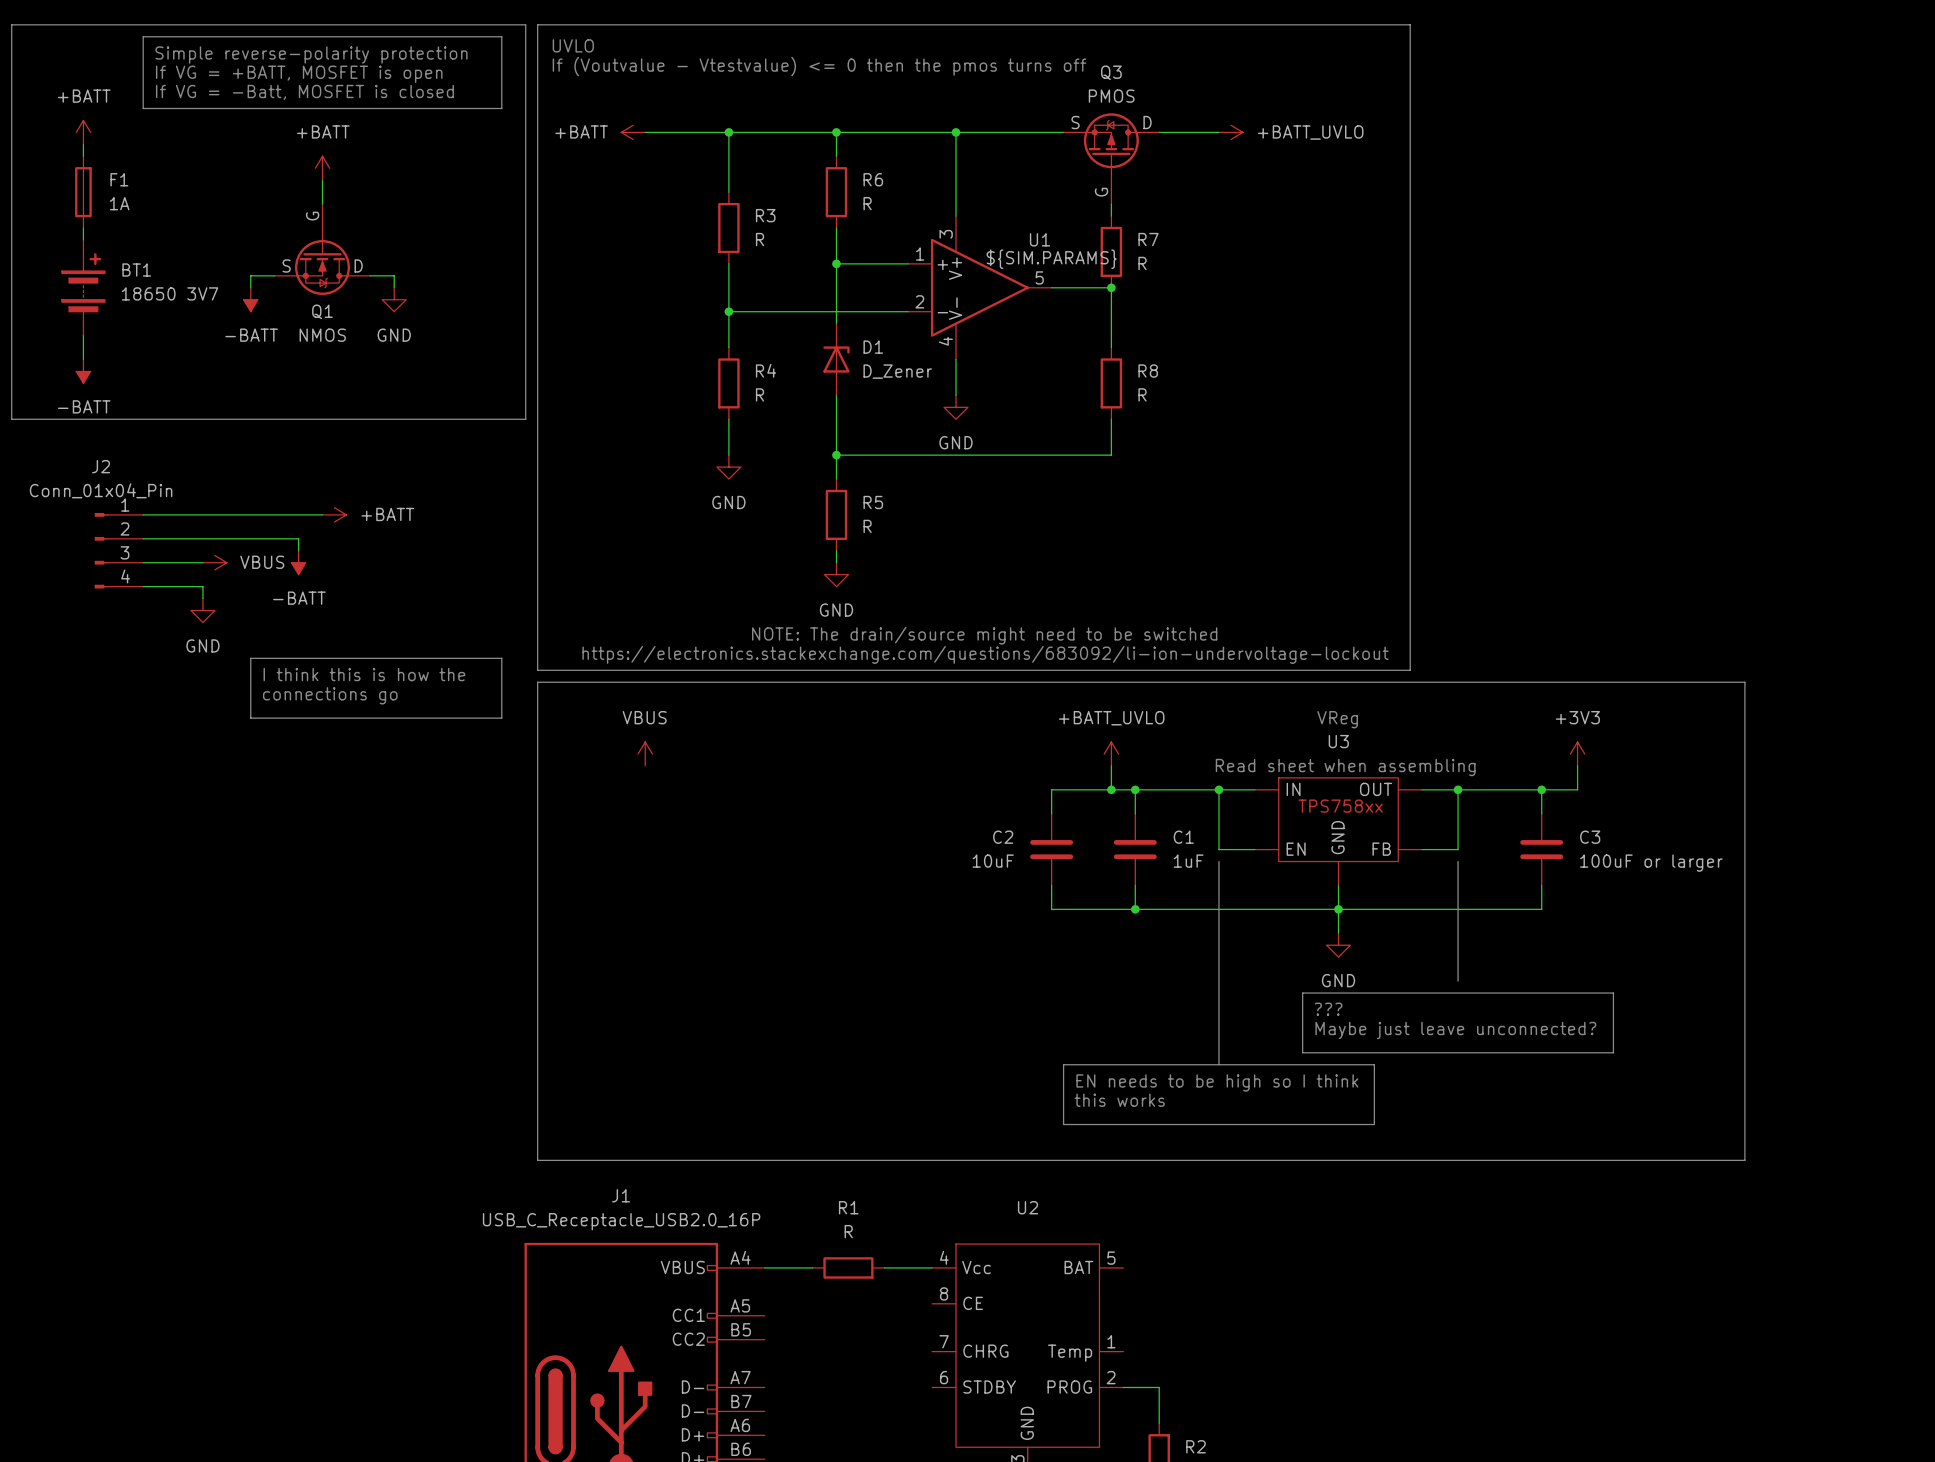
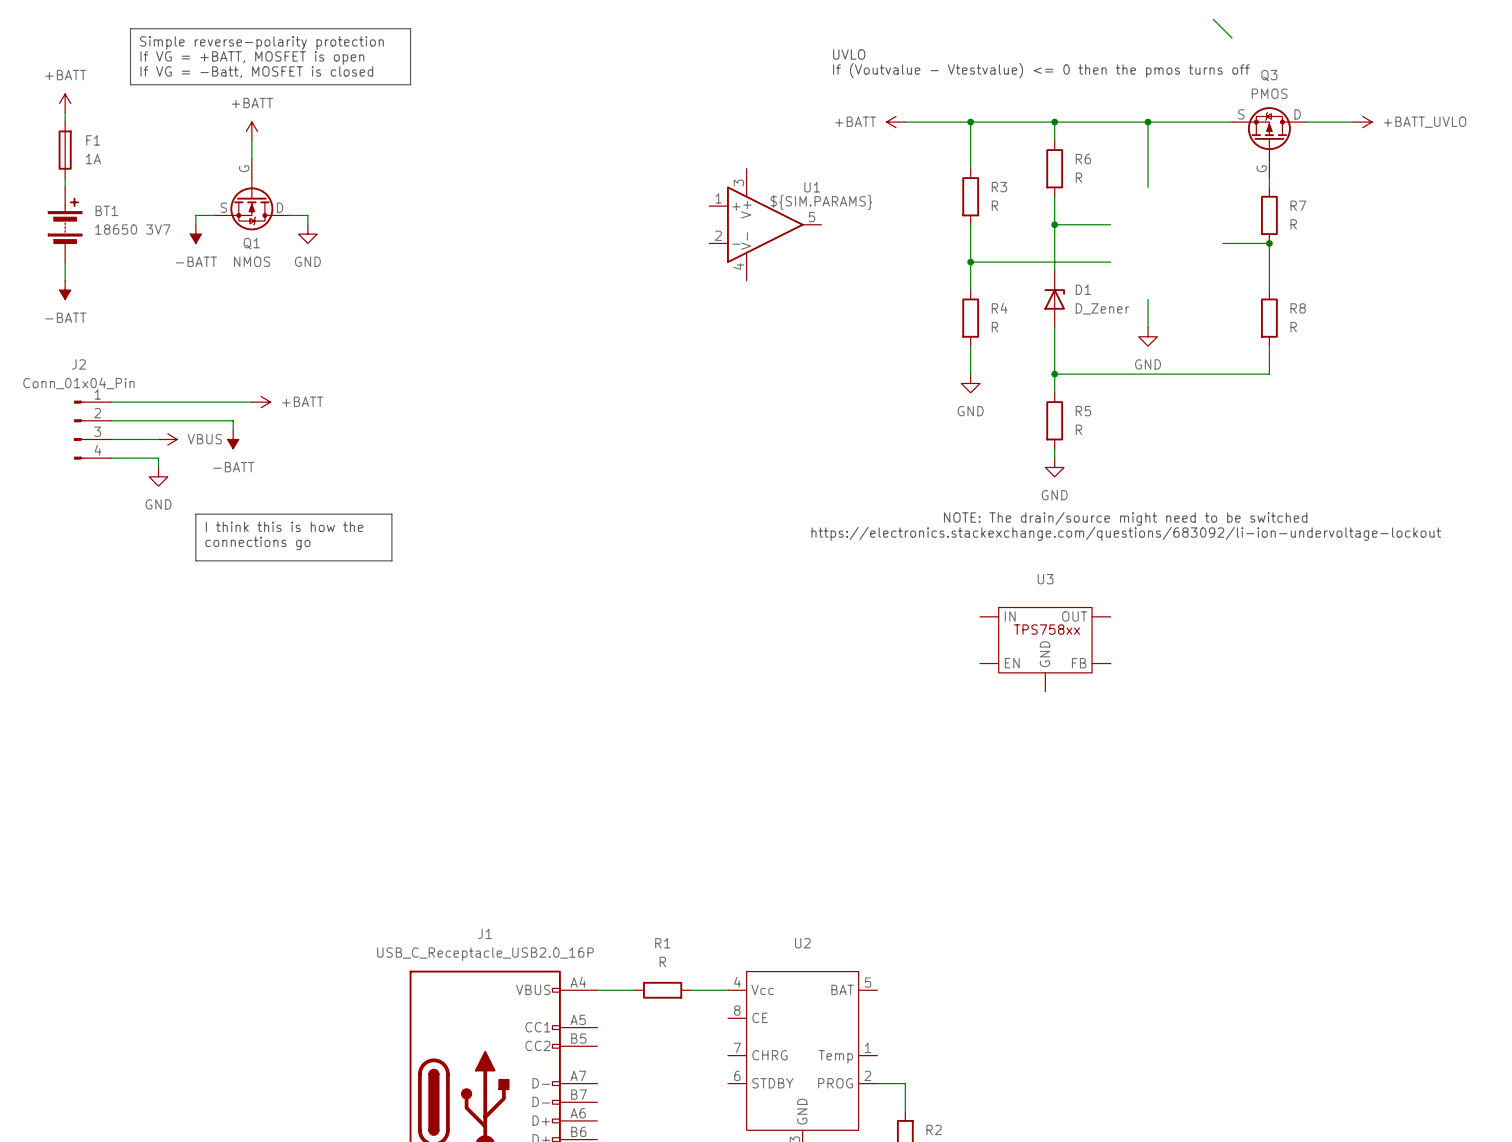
line: (537, 24) (537, 670) (1410, 670) (1410, 24) (537, 24) -> none
wire: none -> (1213, 19) (1232, 38)
line: (167, 36) (143, 36) (143, 108) (167, 108) -> (130, 28) (130, 84)
line: (501, 36) (501, 108) -> (391, 28) (410, 28)
line: (525, 36) (525, 24) (11, 24) (11, 419) (525, 419) (525, 108) -> (391, 84) (410, 84)
text: UVLO (573, 45) -> none
text position: Simple reverse-polarity protection (311, 55) -> Simple reverse-polarity protection (261, 42)
text: If (Voutvalue - Vtestvalue) <= 0 then the pmos turns off (819, 66) -> none
text: none -> UVLO (849, 54)
text position: If VG = +BATT, MOSFET is open (299, 74) -> If VG = +BATT, MOSFET is open (252, 57)
text: none -> If (Voutvalue - Vtestvalue) <= 0 then the pmos turns off (1041, 70)
text position: If VG = -Batt, MOSFET is closed (304, 92) -> If VG = -Batt, MOSFET is closed (256, 72)
power symbol: +BATT (633, 132) -> none
wire: (645, 132) (1063, 132) -> none
wire: (728, 132) (728, 192) -> none
junction: (728, 132) -> none
wire: (836, 132) (836, 156) -> none
junction: (836, 132) -> none
wire: (956, 132) (956, 216) -> none
junction: (956, 132) -> none
wire: (1159, 132) (1218, 132) -> none
power symbol: +BATT_UVLO (1230, 132) -> none
power symbol: none -> +BATT (895, 122)
wire: none -> (905, 122) (1232, 122)
wire: none -> (970, 122) (970, 168)
junction: none -> (970, 122)
wire: none -> (1054, 122) (1054, 140)
junction: none -> (1054, 122)
wire: none -> (1148, 122) (1148, 187)
junction: none -> (1148, 122)
wire: none -> (1306, 122) (1353, 122)
power symbol: none -> +BATT_UVLO (1362, 122)
Q3 position: (1111, 158) -> (1269, 142)
R6 position: (836, 192) -> (1054, 168)
wire: (1111, 204) (1111, 216) -> none
R3 position: (728, 228) -> (970, 196)
wire: (836, 228) (836, 323) -> none
wire: none -> (1269, 178) (1269, 187)
R7 position: (1111, 251) -> (1269, 215)
wire: none -> (1054, 196) (1054, 271)
wire: (728, 263) (728, 347) -> none
wire: (836, 263) (908, 263) -> none
junction: (836, 263) -> none
wire: (1051, 287) (1111, 287) (1111, 347) -> none
junction: (1111, 287) -> none
wire: none -> (970, 224) (970, 290)
wire: none -> (1054, 224) (1110, 224)
junction: none -> (1054, 224)
wire: (728, 311) (908, 311) -> none
junction: (728, 311) -> none
wire: none -> (1222, 243) (1269, 243) (1269, 290)
junction: none -> (1269, 243)
wire: none -> (970, 262) (1110, 262)
junction: none -> (970, 262)
D1 position: (836, 359) -> (1054, 299)
wire: (956, 359) (956, 395) -> none
R4 position: (728, 383) -> (970, 318)
R8 position: (1111, 383) -> (1269, 318)
wire: none -> (1148, 299) (1148, 327)
wire: (836, 395) (836, 479) -> none
power symbol: GND (956, 407) -> none
wire: (728, 419) (728, 455) -> none
wire: (1111, 419) (1111, 455) (836, 455) -> none
wire: none -> (1054, 327) (1054, 392)
power symbol: none -> GND (1148, 336)
wire: none -> (970, 346) (970, 374)
wire: none -> (1269, 346) (1269, 374) (1054, 374)
junction: (836, 455) -> none
power symbol: GND (728, 467) -> none
junction: none -> (1054, 374)
power symbol: none -> GND (970, 383)
R5 position: (836, 514) -> (1054, 420)
wire: (836, 550) (836, 562) -> none
power symbol: GND (836, 574) -> none
wire: none -> (1054, 448) (1054, 458)
power symbol: none -> GND (1054, 467)
text: NOTE: The drain/source might need to be switched (984, 635) -> none
text: https://electronics.stackexchange.com/questions/683092/li-ion-undervoltage-lockout (985, 654) -> none
text: none -> NOTE: The drain/source might need to be switched (1125, 518)
line: (537, 682) (1744, 682) (1744, 1160) (537, 1160) (537, 682) -> none
text: none -> https://electronics.stackexchange.com/questions/683092/li-ion-undervoltage-lockout (1126, 533)
text: VReg (1337, 719) -> none
power symbol: VBUS (645, 753) -> none
power symbol: +BATT_UVLO (1111, 753) -> none
power symbol: +3V3 (1577, 753) -> none
wire: (1111, 765) (1111, 789) -> none
wire: (1577, 765) (1577, 789) (1422, 789) -> none
text: Read sheet when assembling (1345, 767) -> none
junction: (1111, 789) -> none
wire: (1135, 789) (1135, 813) -> none
junction: (1135, 789) -> none
wire: (1218, 789) (1218, 849) (1254, 849) -> none
junction: (1218, 789) -> none
wire: (1254, 789) (1051, 789) (1051, 813) -> none
wire: (1458, 789) (1458, 849) (1422, 849) -> none
junction: (1458, 789) -> none
wire: (1541, 789) (1541, 813) -> none
junction: (1541, 789) -> none
C2: 10uF (1051, 849) -> none
C1: 1uF (1135, 849) -> none
C3: 100uF or larger (1541, 849) -> none
line: (1218, 861) (1218, 1064) -> none
line: (1458, 861) (1458, 981) -> none
wire: (1051, 885) (1051, 909) (1541, 909) (1541, 885) -> none
wire: (1135, 885) (1135, 909) -> none
wire: (1338, 885) (1338, 933) -> none
junction: (1135, 909) -> none
junction: (1338, 909) -> none
power symbol: GND (1338, 945) -> none
line: (1302, 993) (1613, 993) (1613, 1052) (1302, 1052) (1302, 993) -> none
text: ??? (1328, 1009) -> none
text: Maybe just leave unconnected? (1455, 1030) -> none
line: (1063, 1064) (1374, 1064) (1374, 1124) (1063, 1124) (1063, 1064) -> none
text: EN needs to be high so I think (1217, 1082) -> none
text: this works (1119, 1100) -> none

